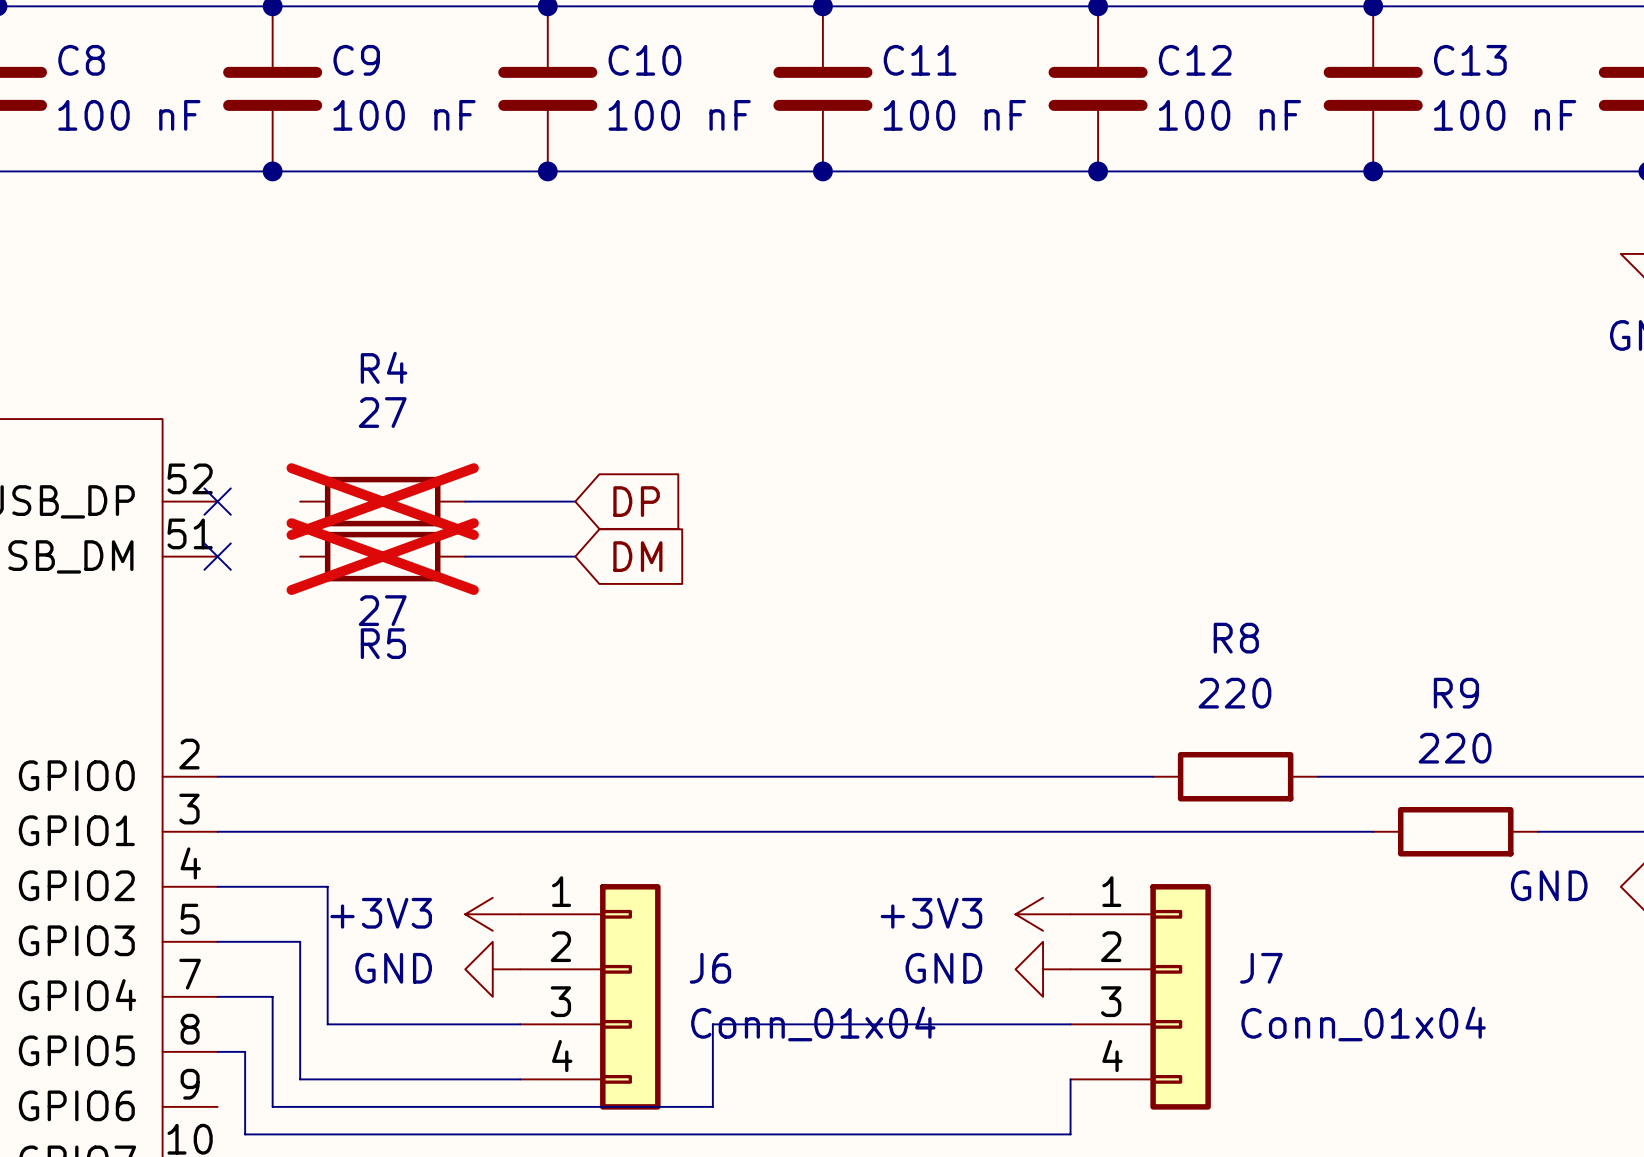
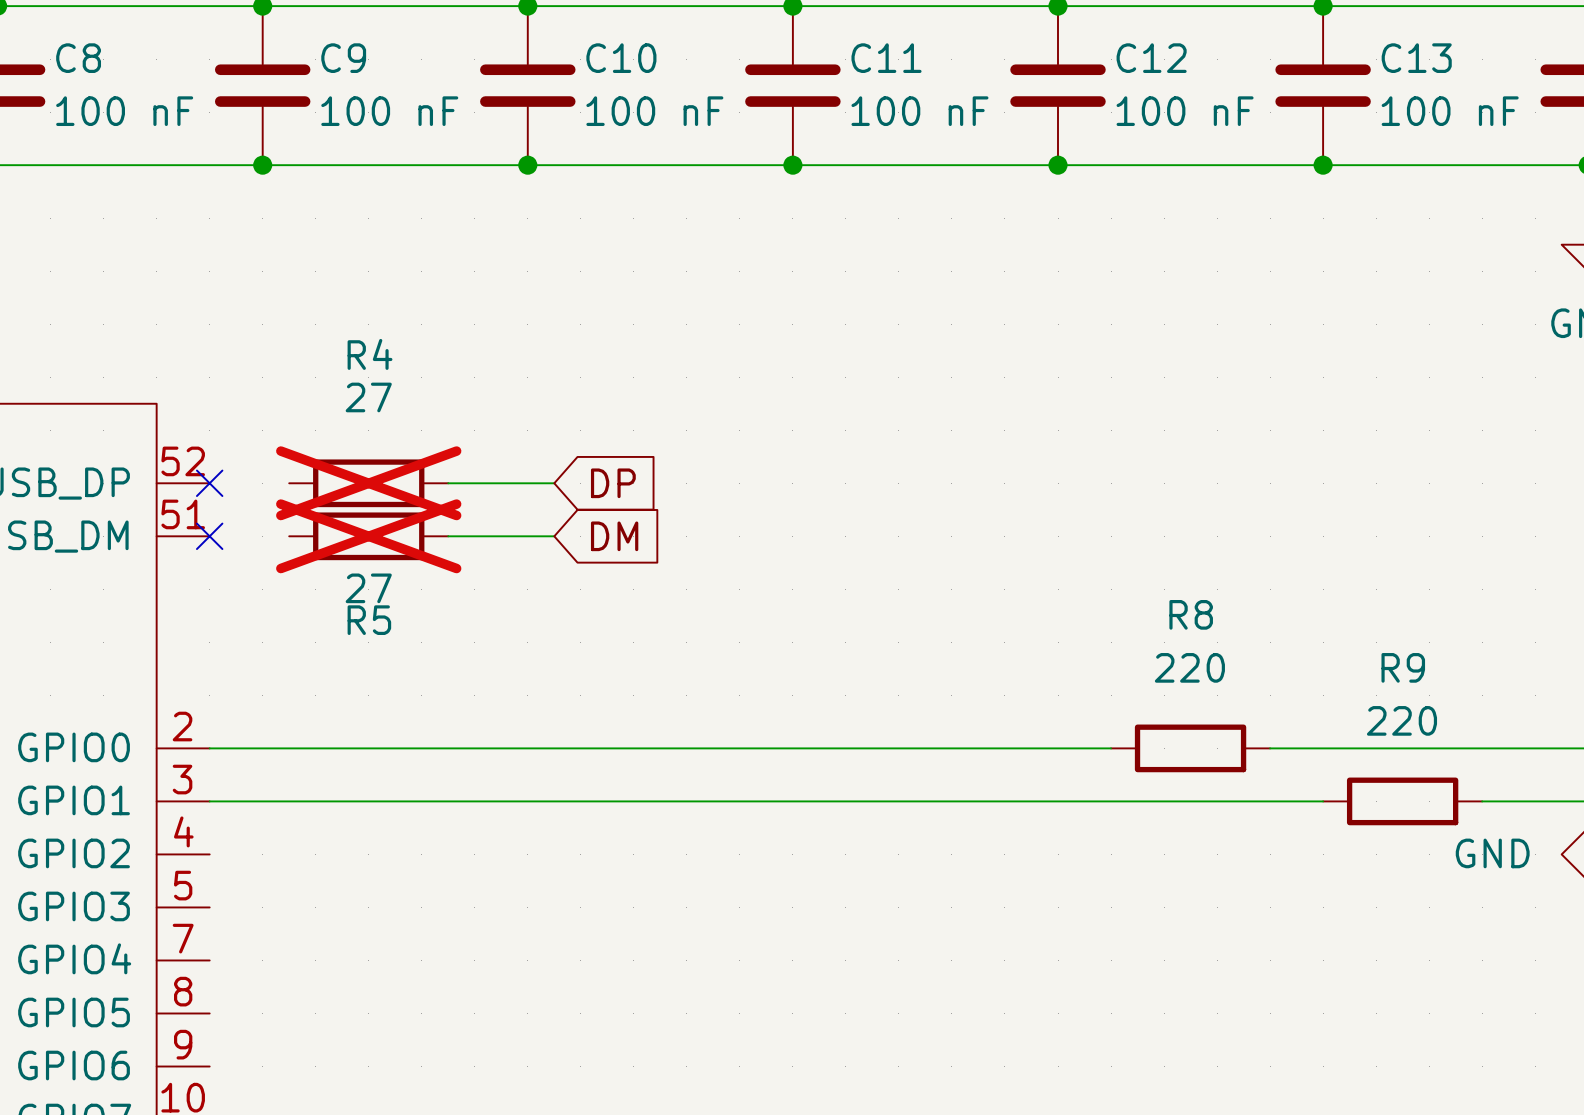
wire: (217, 886) (327, 886) (327, 1024) (520, 1024) -> none
power symbol: +3V3 (492, 914) -> none
power symbol: +3V3 (1043, 914) -> none
wire: (217, 941) (300, 941) (300, 1079) (520, 1079) -> none
power symbol: GND (492, 969) -> none
power symbol: GND (1043, 969) -> none
wire: (217, 996) (272, 996) (272, 1106) (712, 1106) (712, 1024) (1070, 1024) -> none
J6: Conn_01x04 (590, 996) -> none
J7: Conn_01x04 (1140, 996) -> none
wire: (217, 1051) (245, 1051) (245, 1134) (1070, 1134) (1070, 1079) -> none

